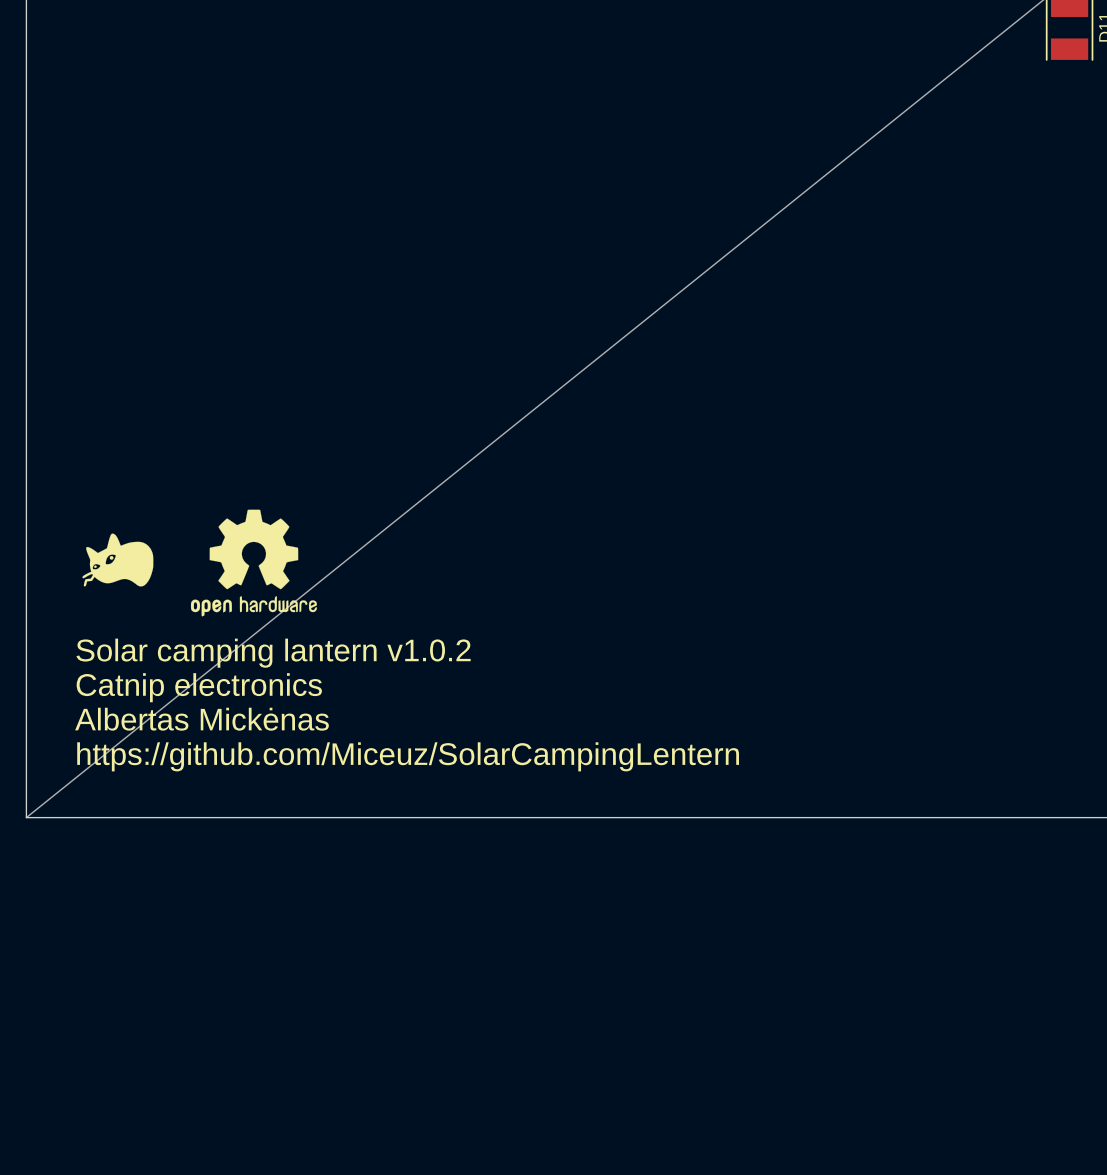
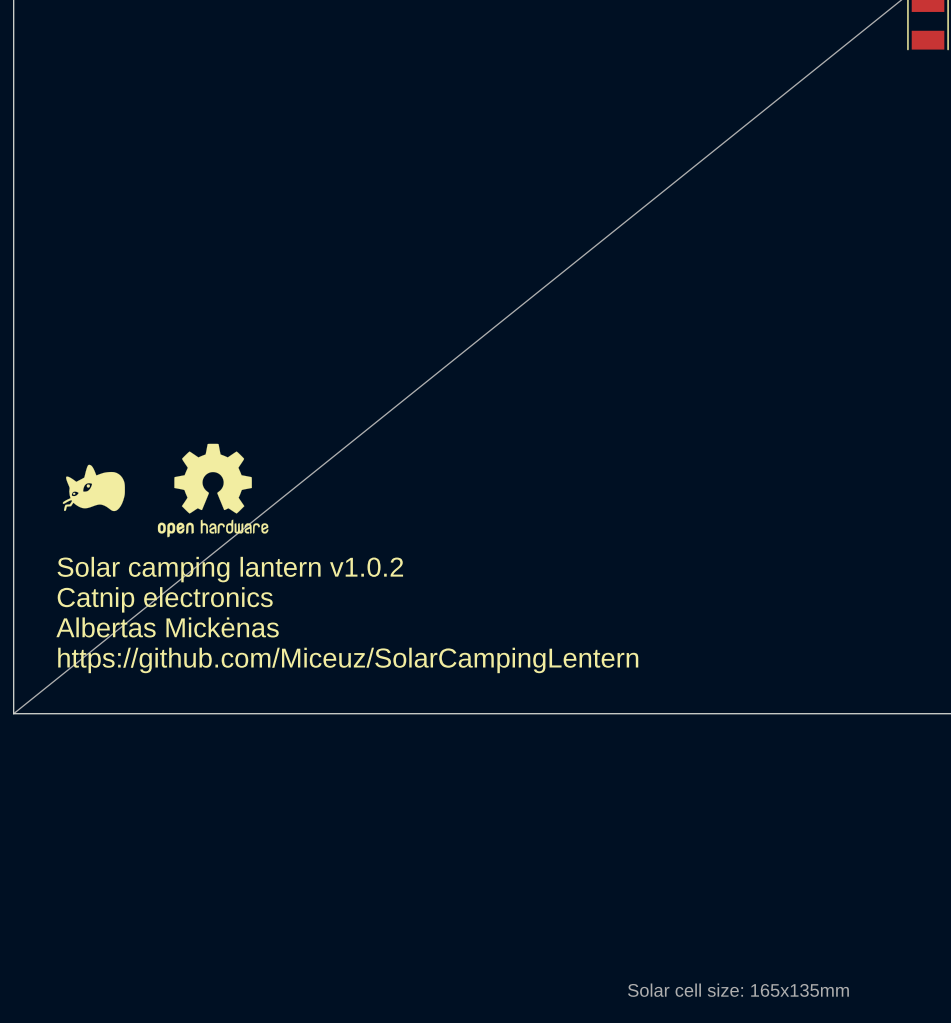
text: none -> Solar cell size: 165x135mm (738, 990)

